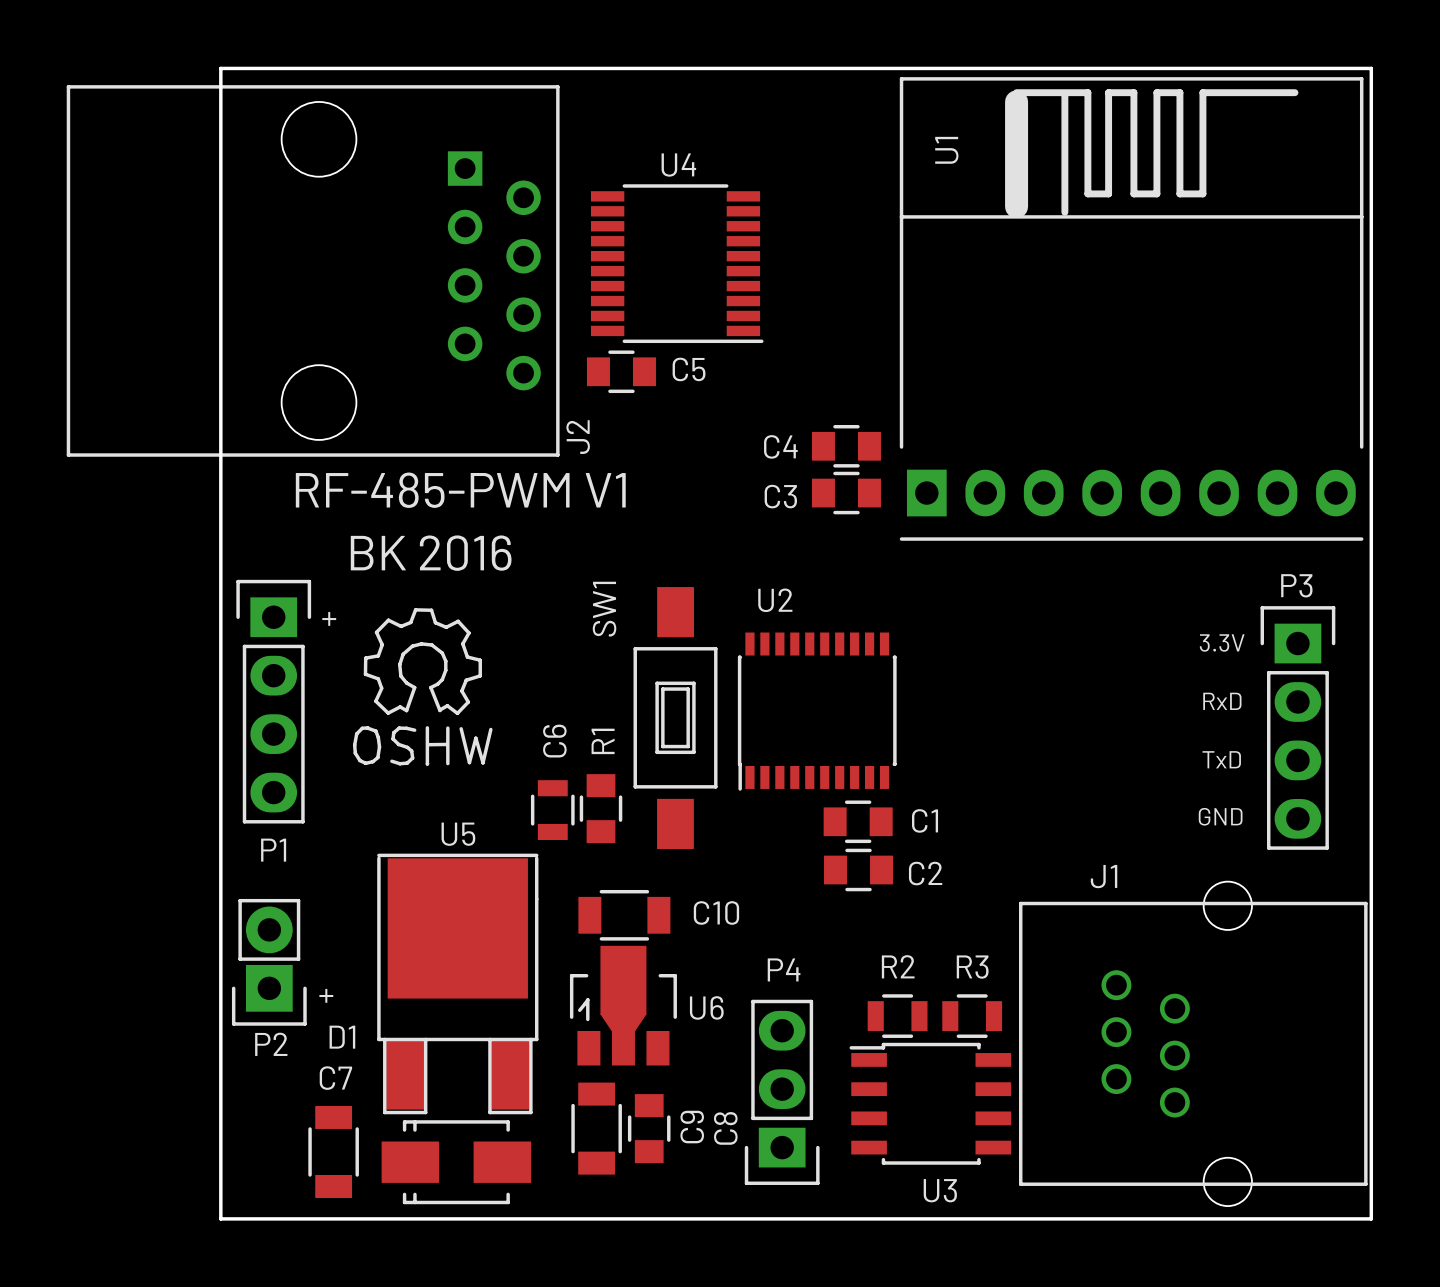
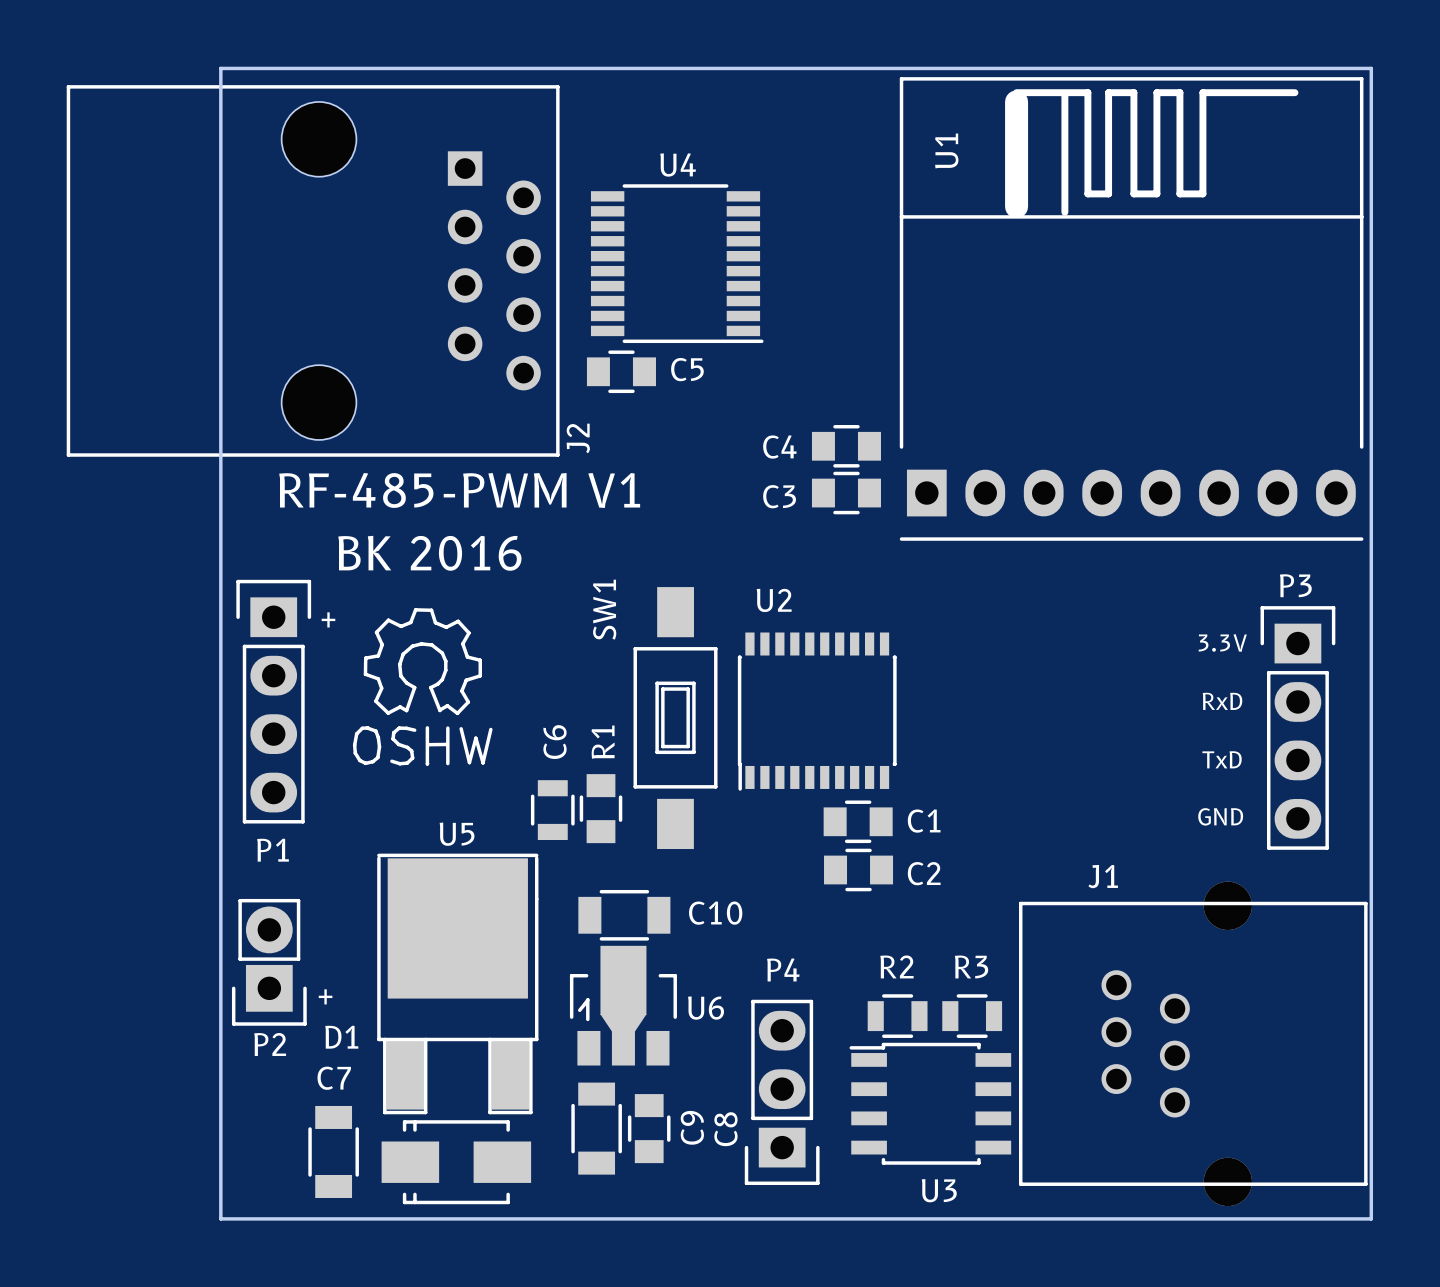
J1 footprint: [1019, 881, 1368, 1207] -> [1019, 881, 1368, 1207]

